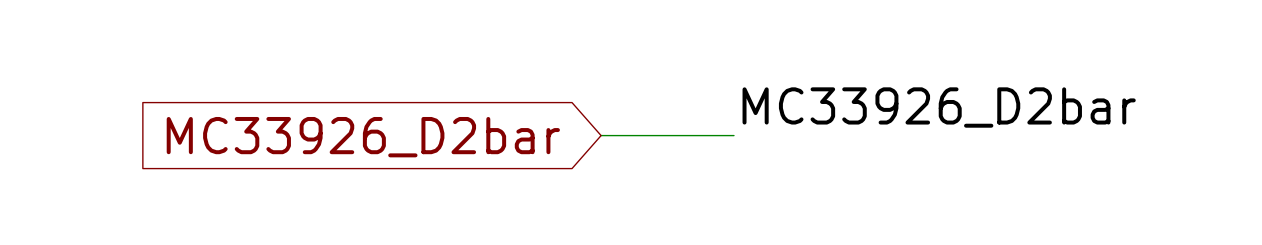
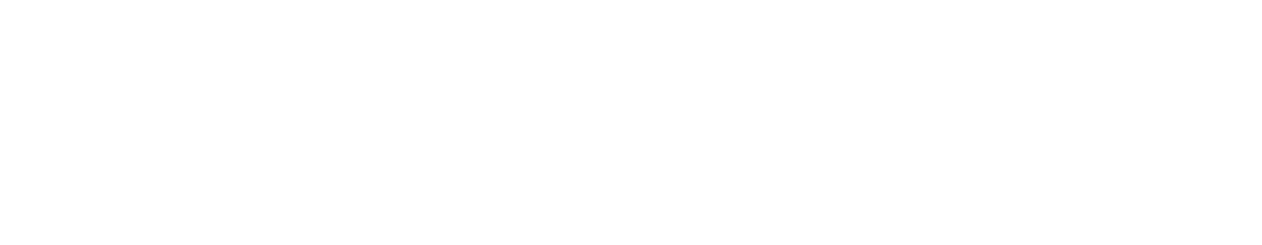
label: MC33926_D2bar (939, 107) -> none
wire: (601, 135) (733, 135) -> none
global label: MC33926_D2bar (363, 137) -> none

